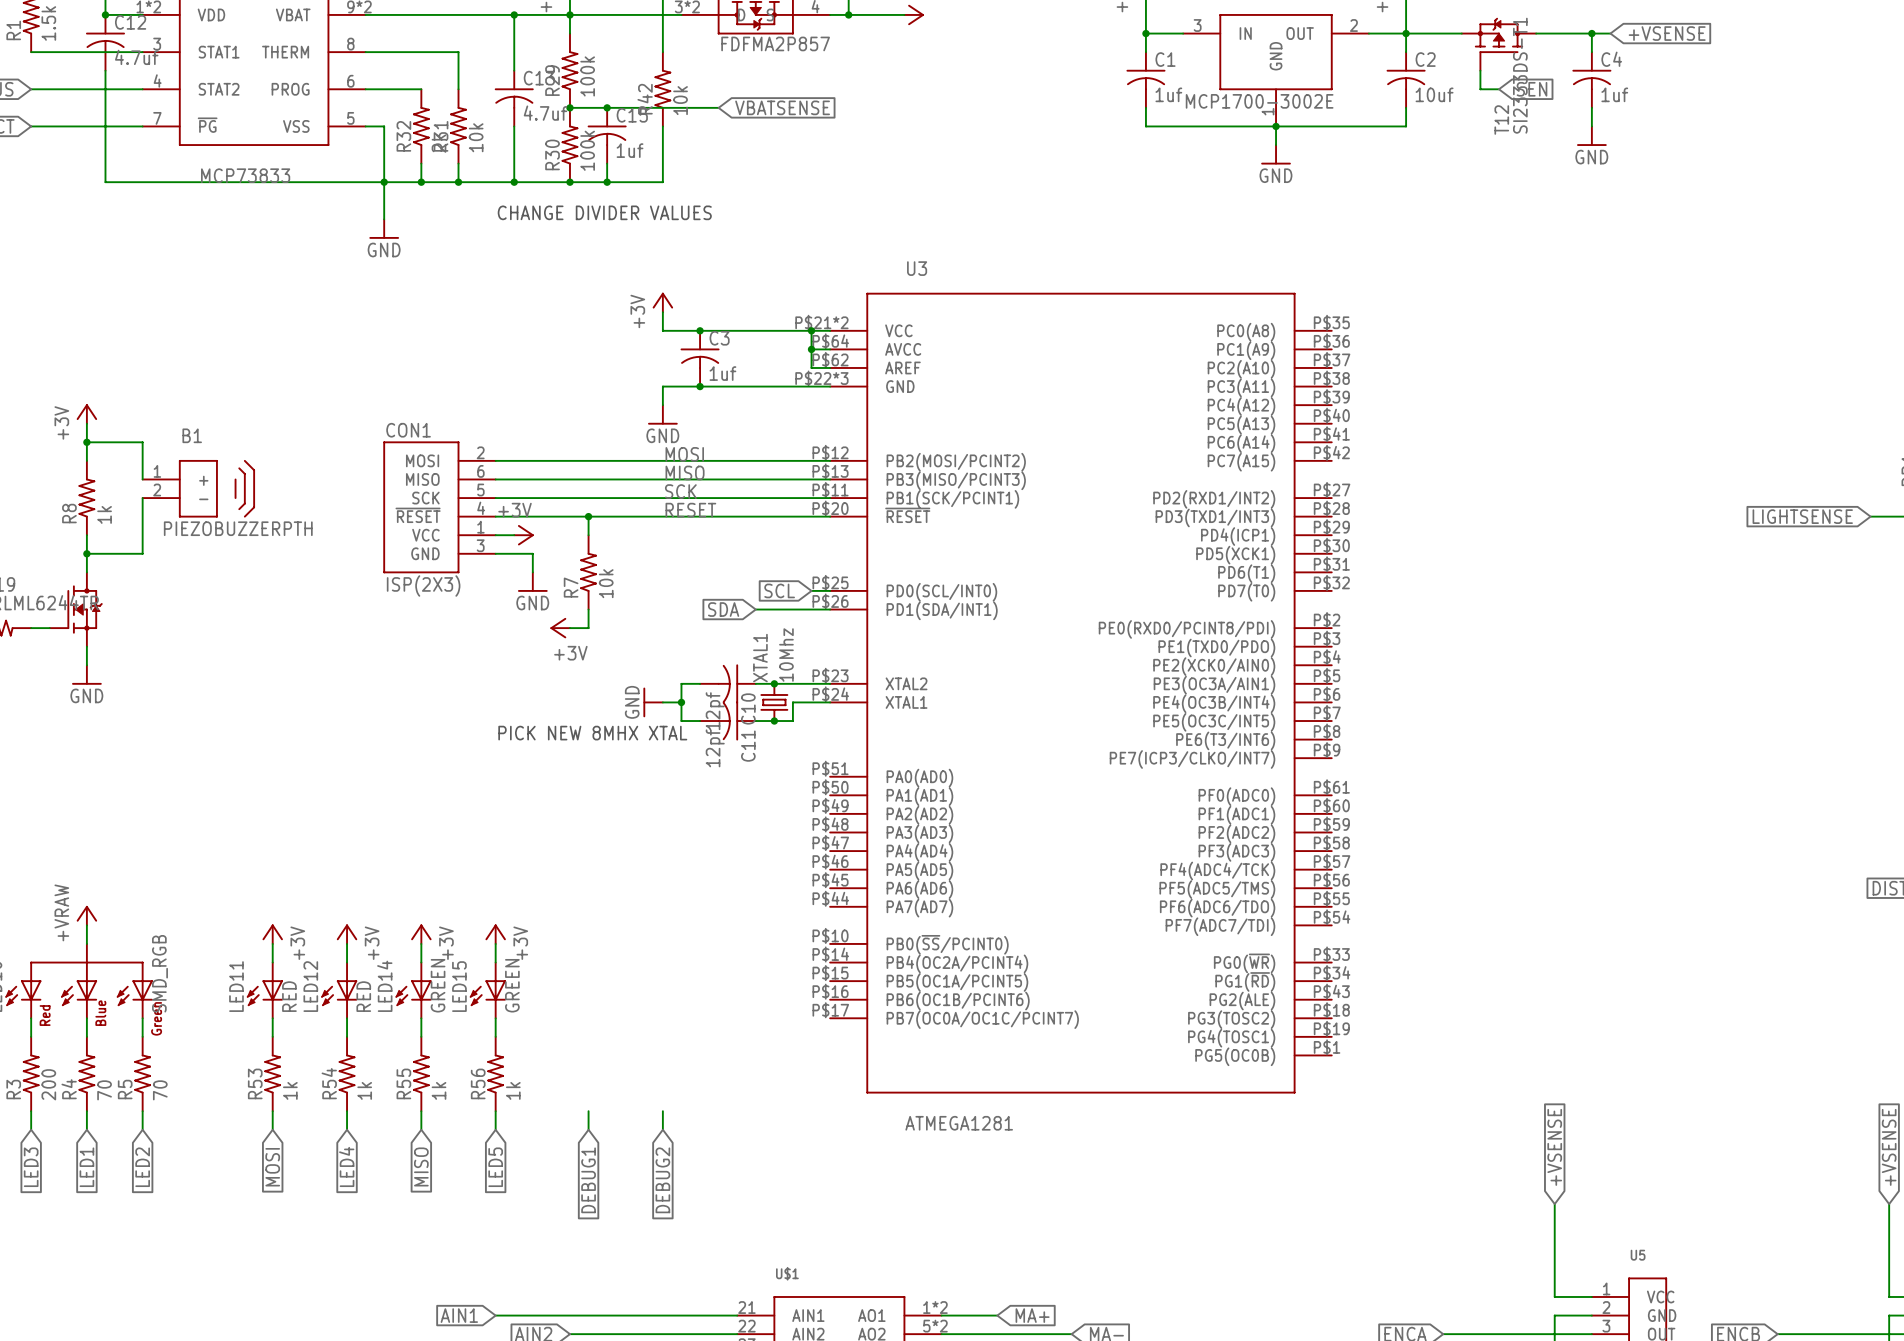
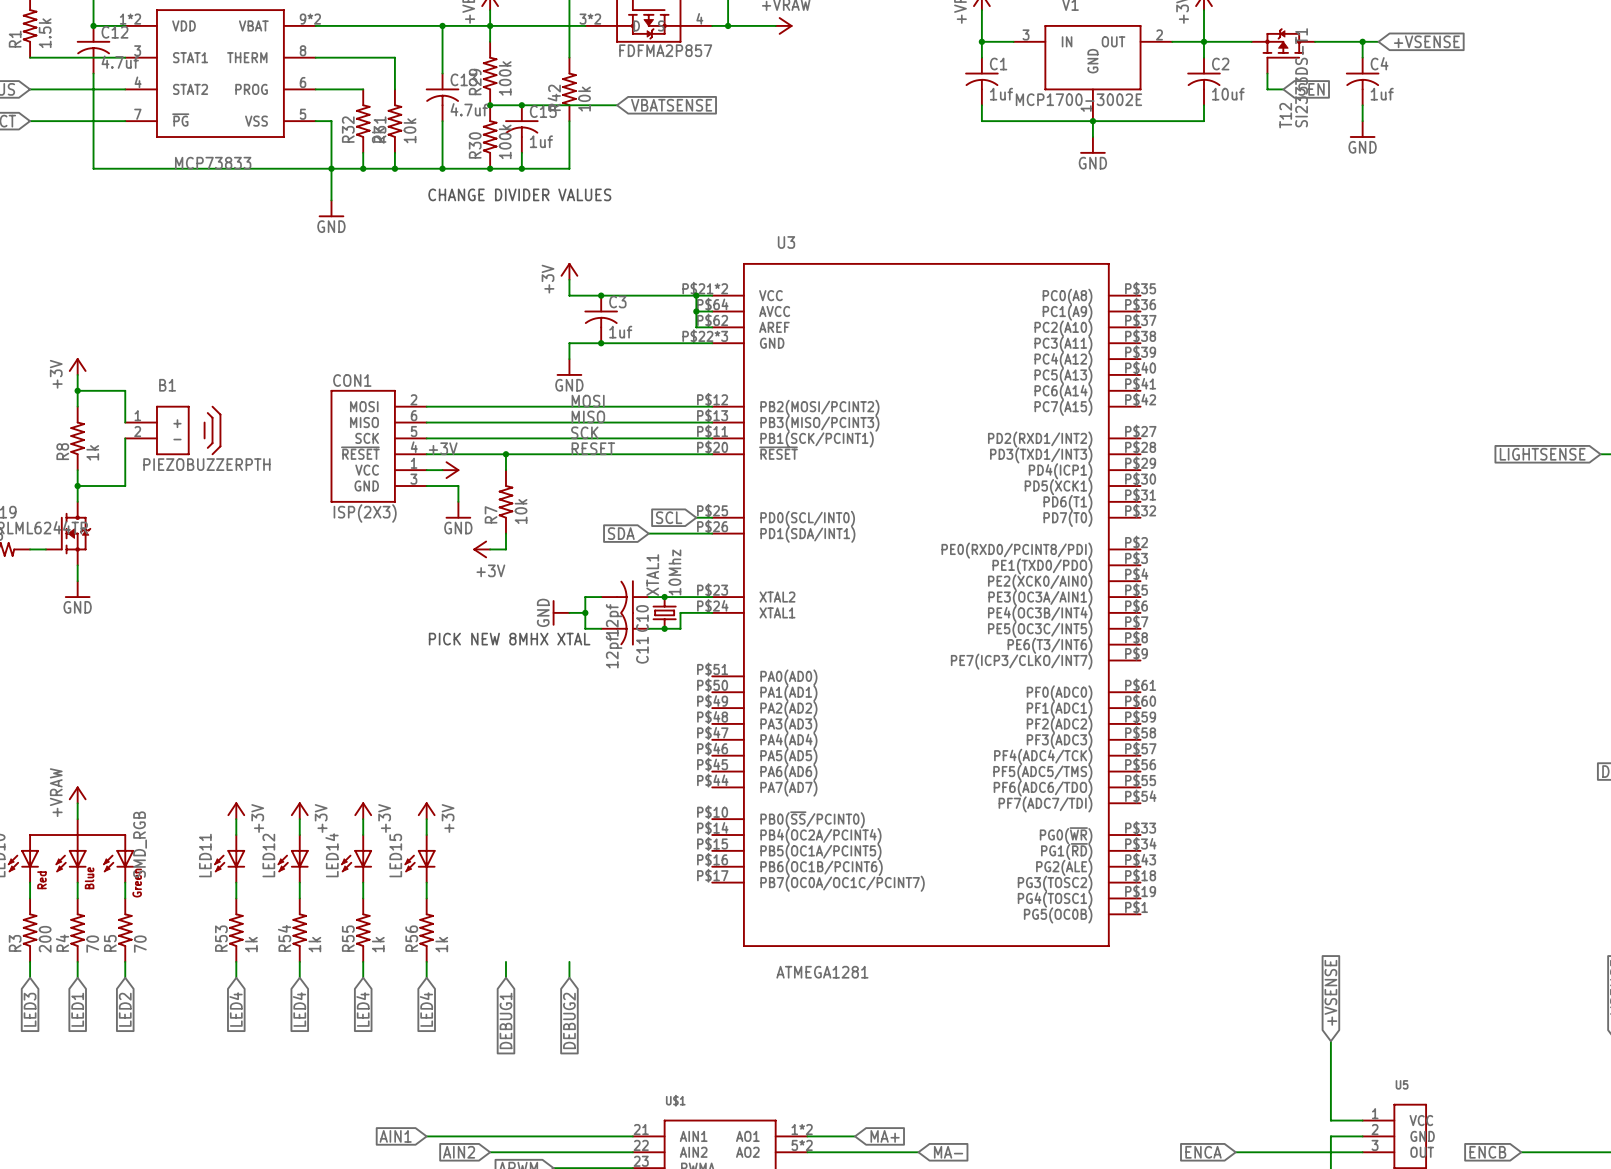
LED14 value: GREEN (438, 985) -> none
LED15 value: GREEN (512, 985) -> none
LED11 value: RED (289, 996) -> none
LED12 value: RED (363, 996) -> none
global label: MISO (421, 1166) -> LED4 (362, 1009)
global label: MOSI (272, 1167) -> LED4 (236, 1009)
global label: LED5 (495, 1167) -> LED4 (426, 1009)

